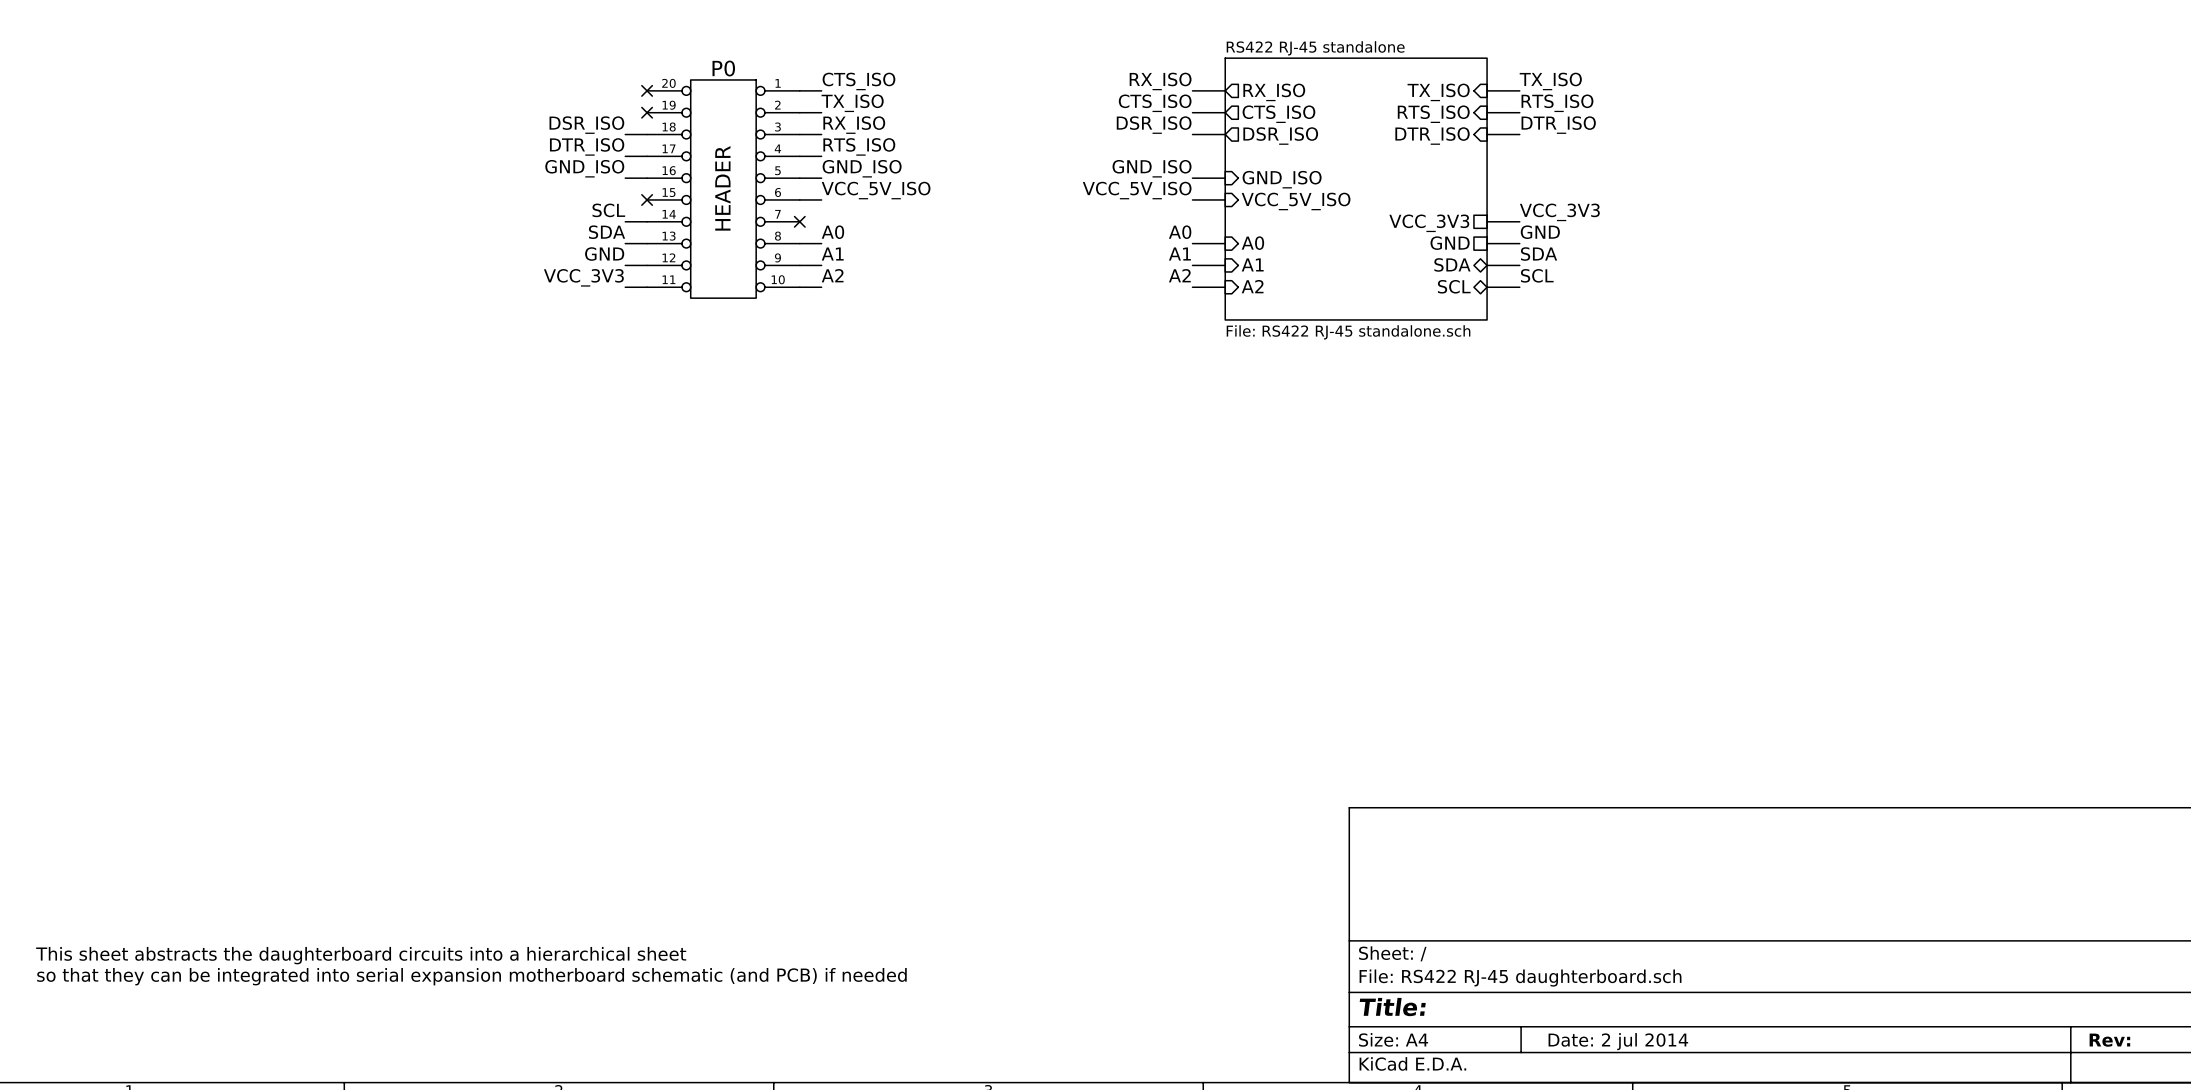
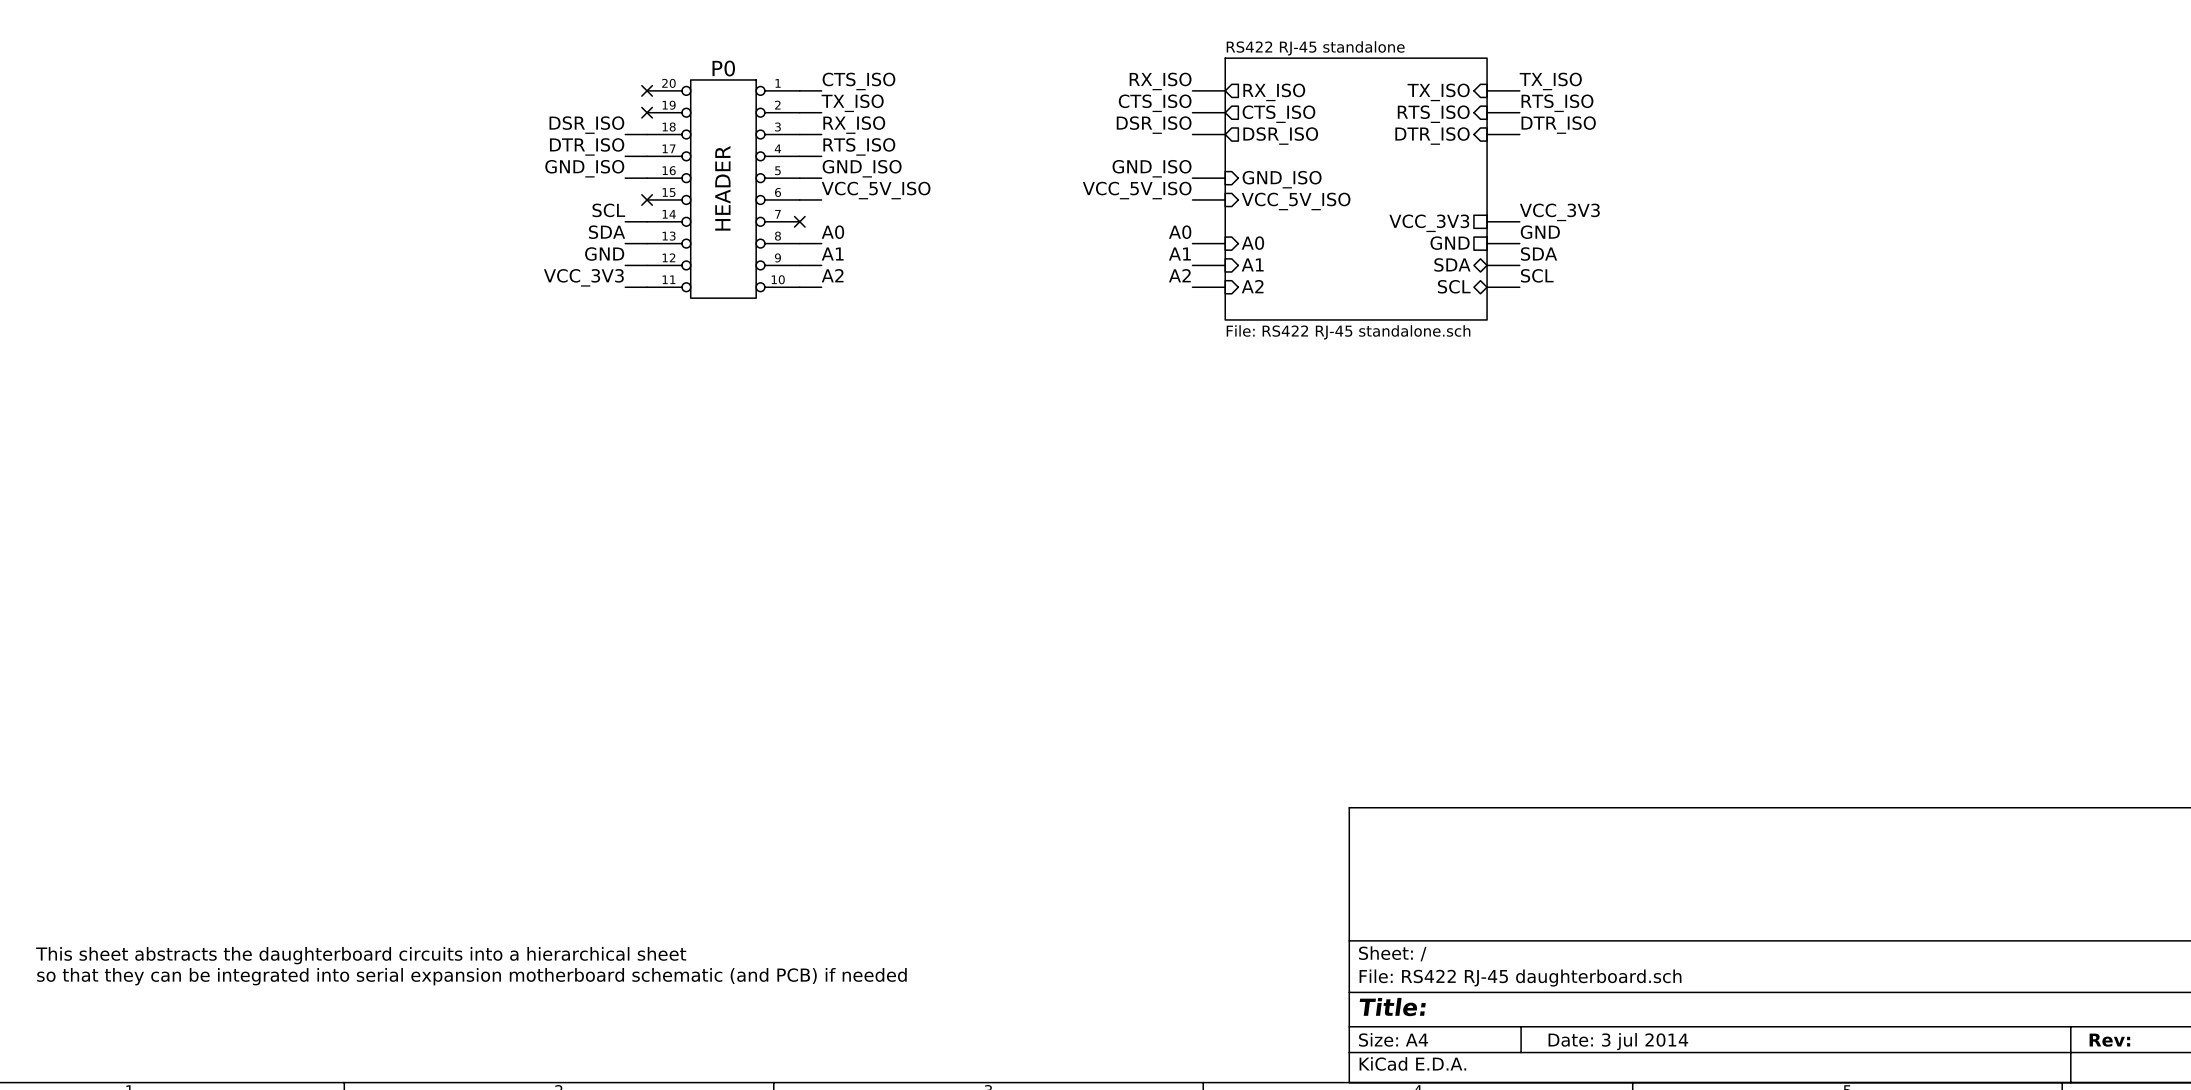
title block: Date: 2 jul 2014 (1618, 1041) -> Date: 3 jul 2014 (1618, 1041)

